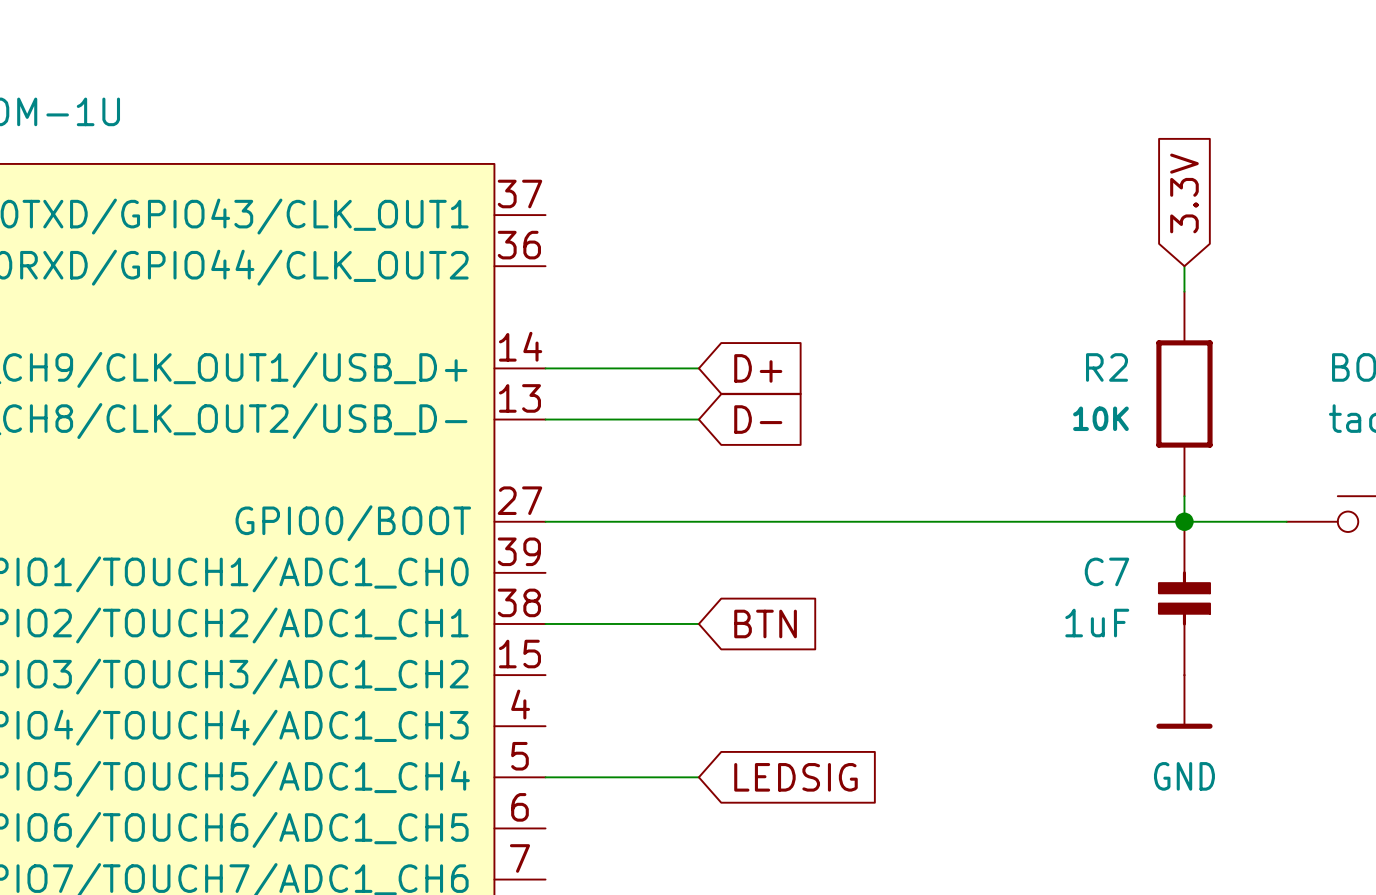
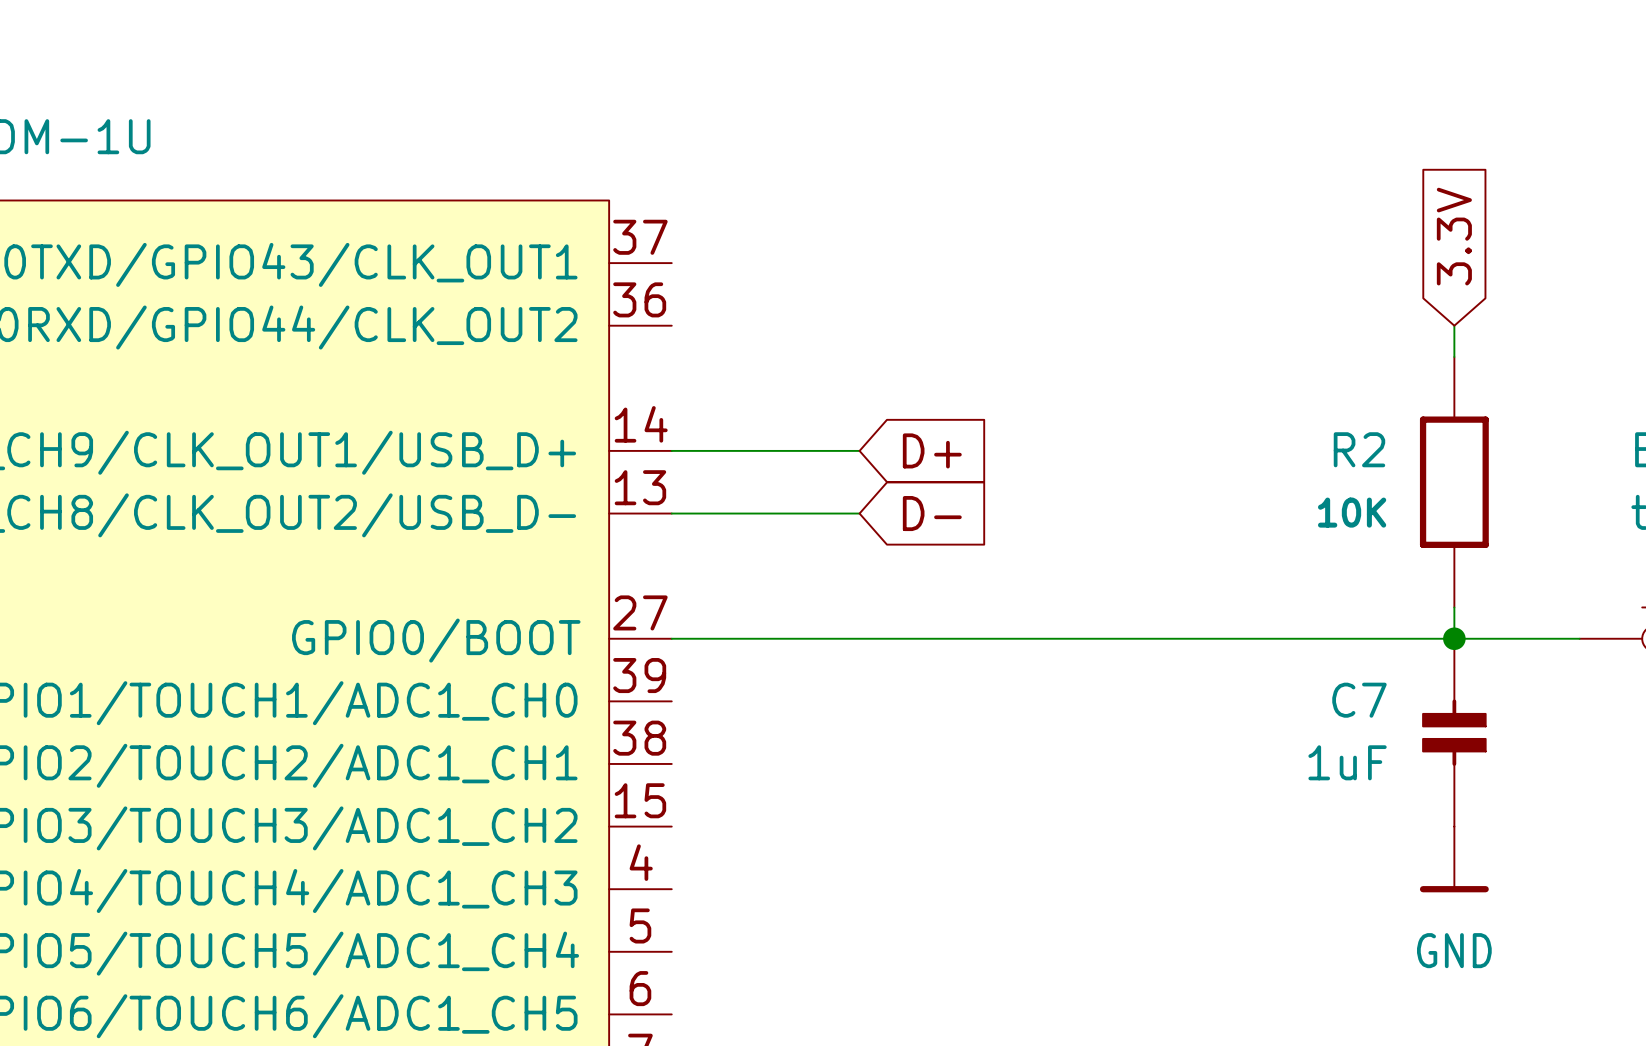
wire: (545, 623) (698, 623) -> none
global label: BTN (765, 623) -> none
wire: (545, 777) (698, 777) -> none
global label: LEDSIG (795, 777) -> none

